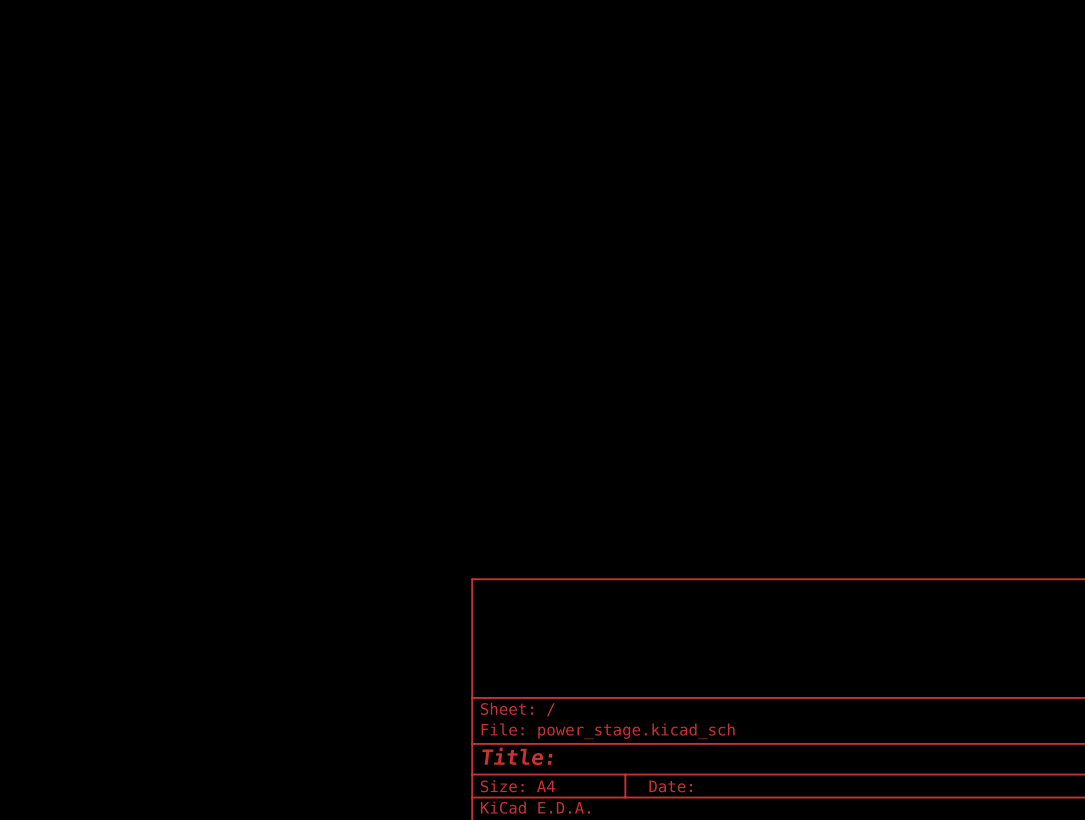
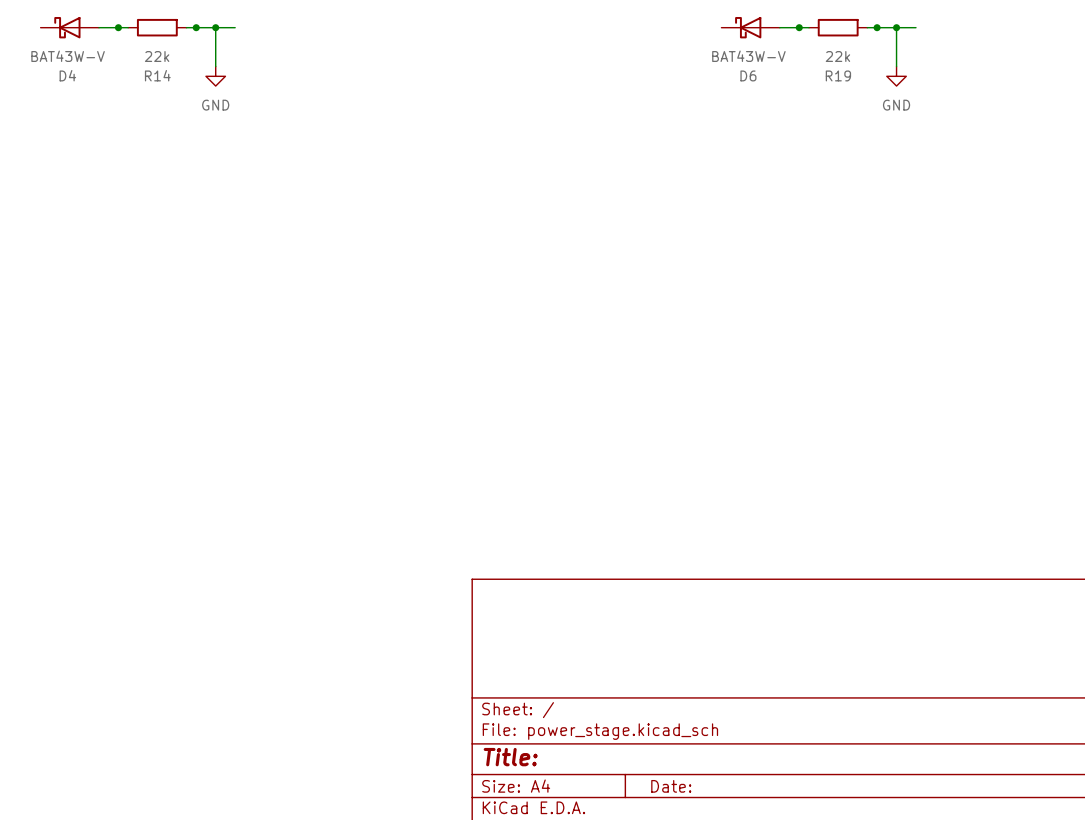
D4: none -> BAT43W-V (69, 27)
wire: none -> (98, 27) (128, 27)
junction: none -> (118, 27)
R14: none -> 22k (157, 27)
wire: none -> (186, 27) (235, 27)
junction: none -> (196, 27)
wire: none -> (215, 27) (215, 66)
junction: none -> (215, 27)
D6: none -> BAT43W-V (750, 27)
wire: none -> (779, 27) (809, 27)
junction: none -> (799, 27)
R19: none -> 22k (838, 27)
wire: none -> (867, 27) (915, 27)
junction: none -> (877, 27)
wire: none -> (896, 27) (896, 66)
junction: none -> (896, 27)
power symbol: none -> GND (215, 76)
power symbol: none -> GND (896, 76)

